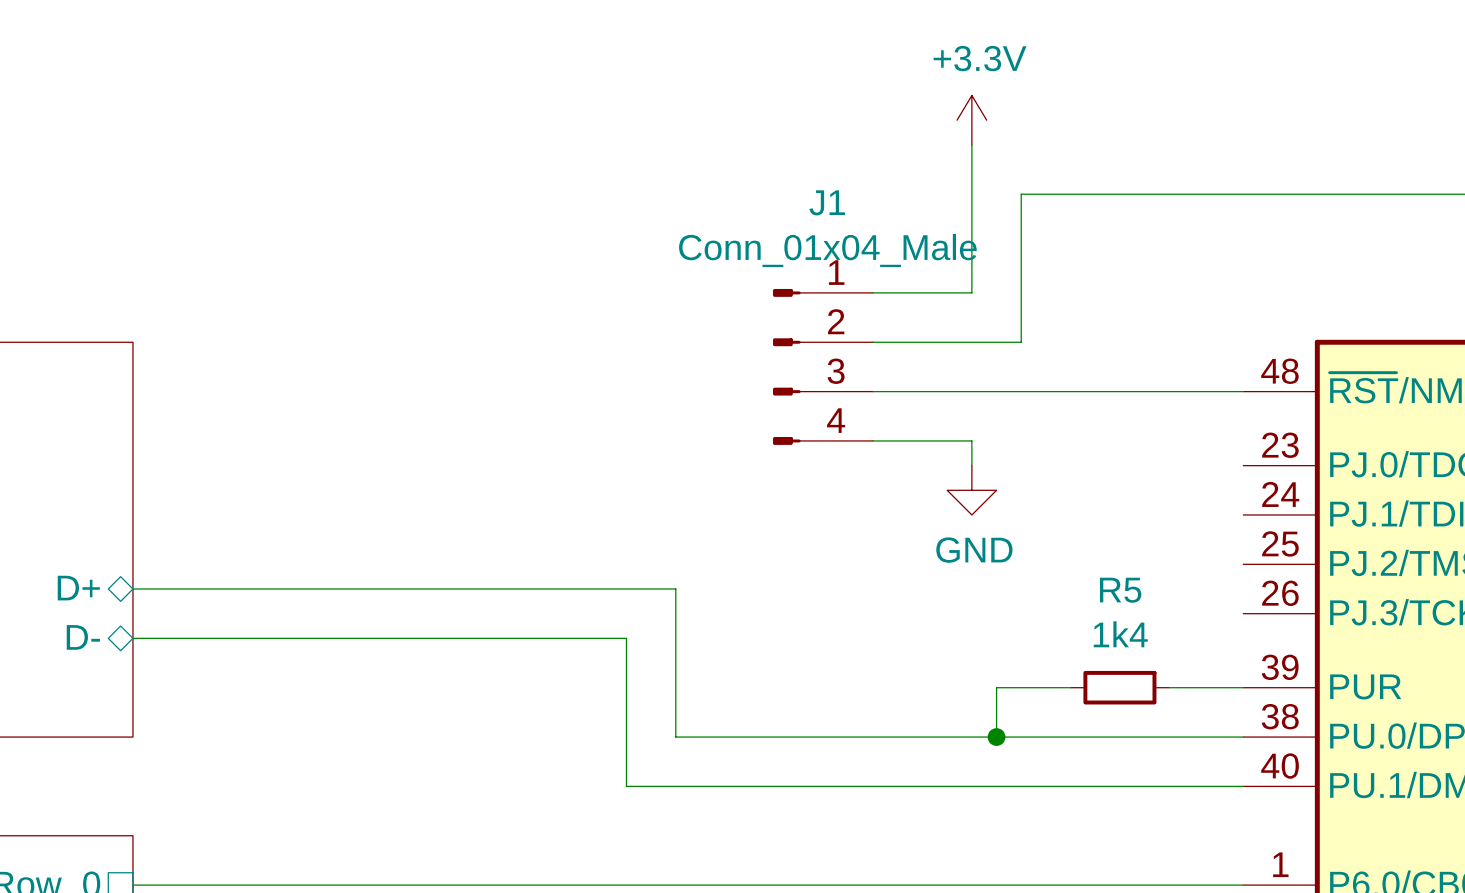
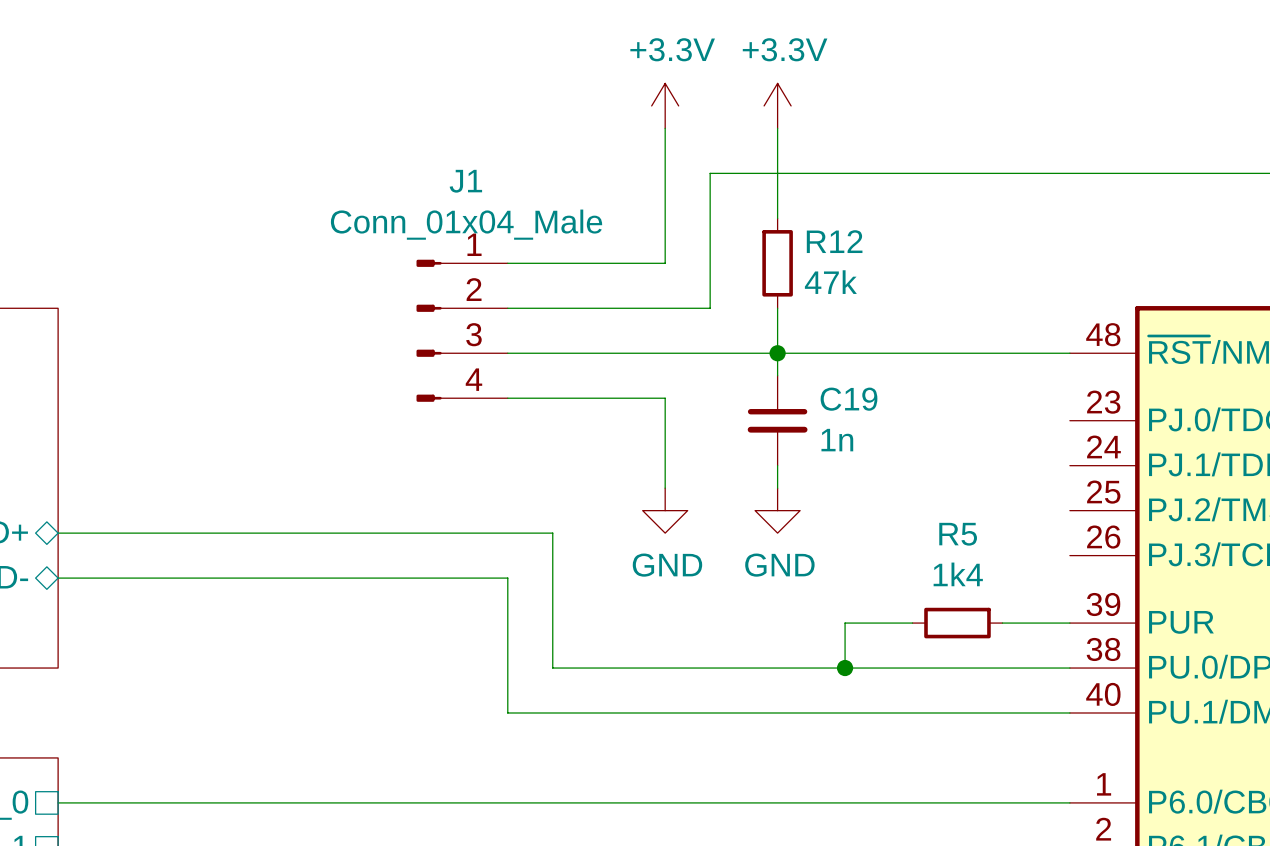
power symbol: none -> +3.3V (665, 105)
power symbol position: +3.3V (971, 120) -> +3.3V (777, 105)
wire: none -> (665, 128) (665, 263) (507, 263)
wire: none -> (777, 128) (777, 218)
wire: (971, 144) (971, 292) (873, 292) -> none
wire: (1021, 194) (1021, 342) (873, 342) -> (867, 173) (710, 173) (710, 308) (507, 308)
R12: none -> 47k (777, 263)
wire: none -> (777, 308) (777, 375)
J1 position: (823, 366) -> (462, 330)
wire: none -> (507, 353) (732, 353)
junction: none -> (777, 353)
wire: none -> (507, 398) (665, 398) (665, 488)
wire: (873, 440) (971, 440) (971, 465) -> none
C19: none -> 1n (777, 420)
power symbol position: GND (971, 490) -> GND (777, 510)
wire: none -> (777, 465) (777, 488)
power symbol: none -> GND (665, 510)

